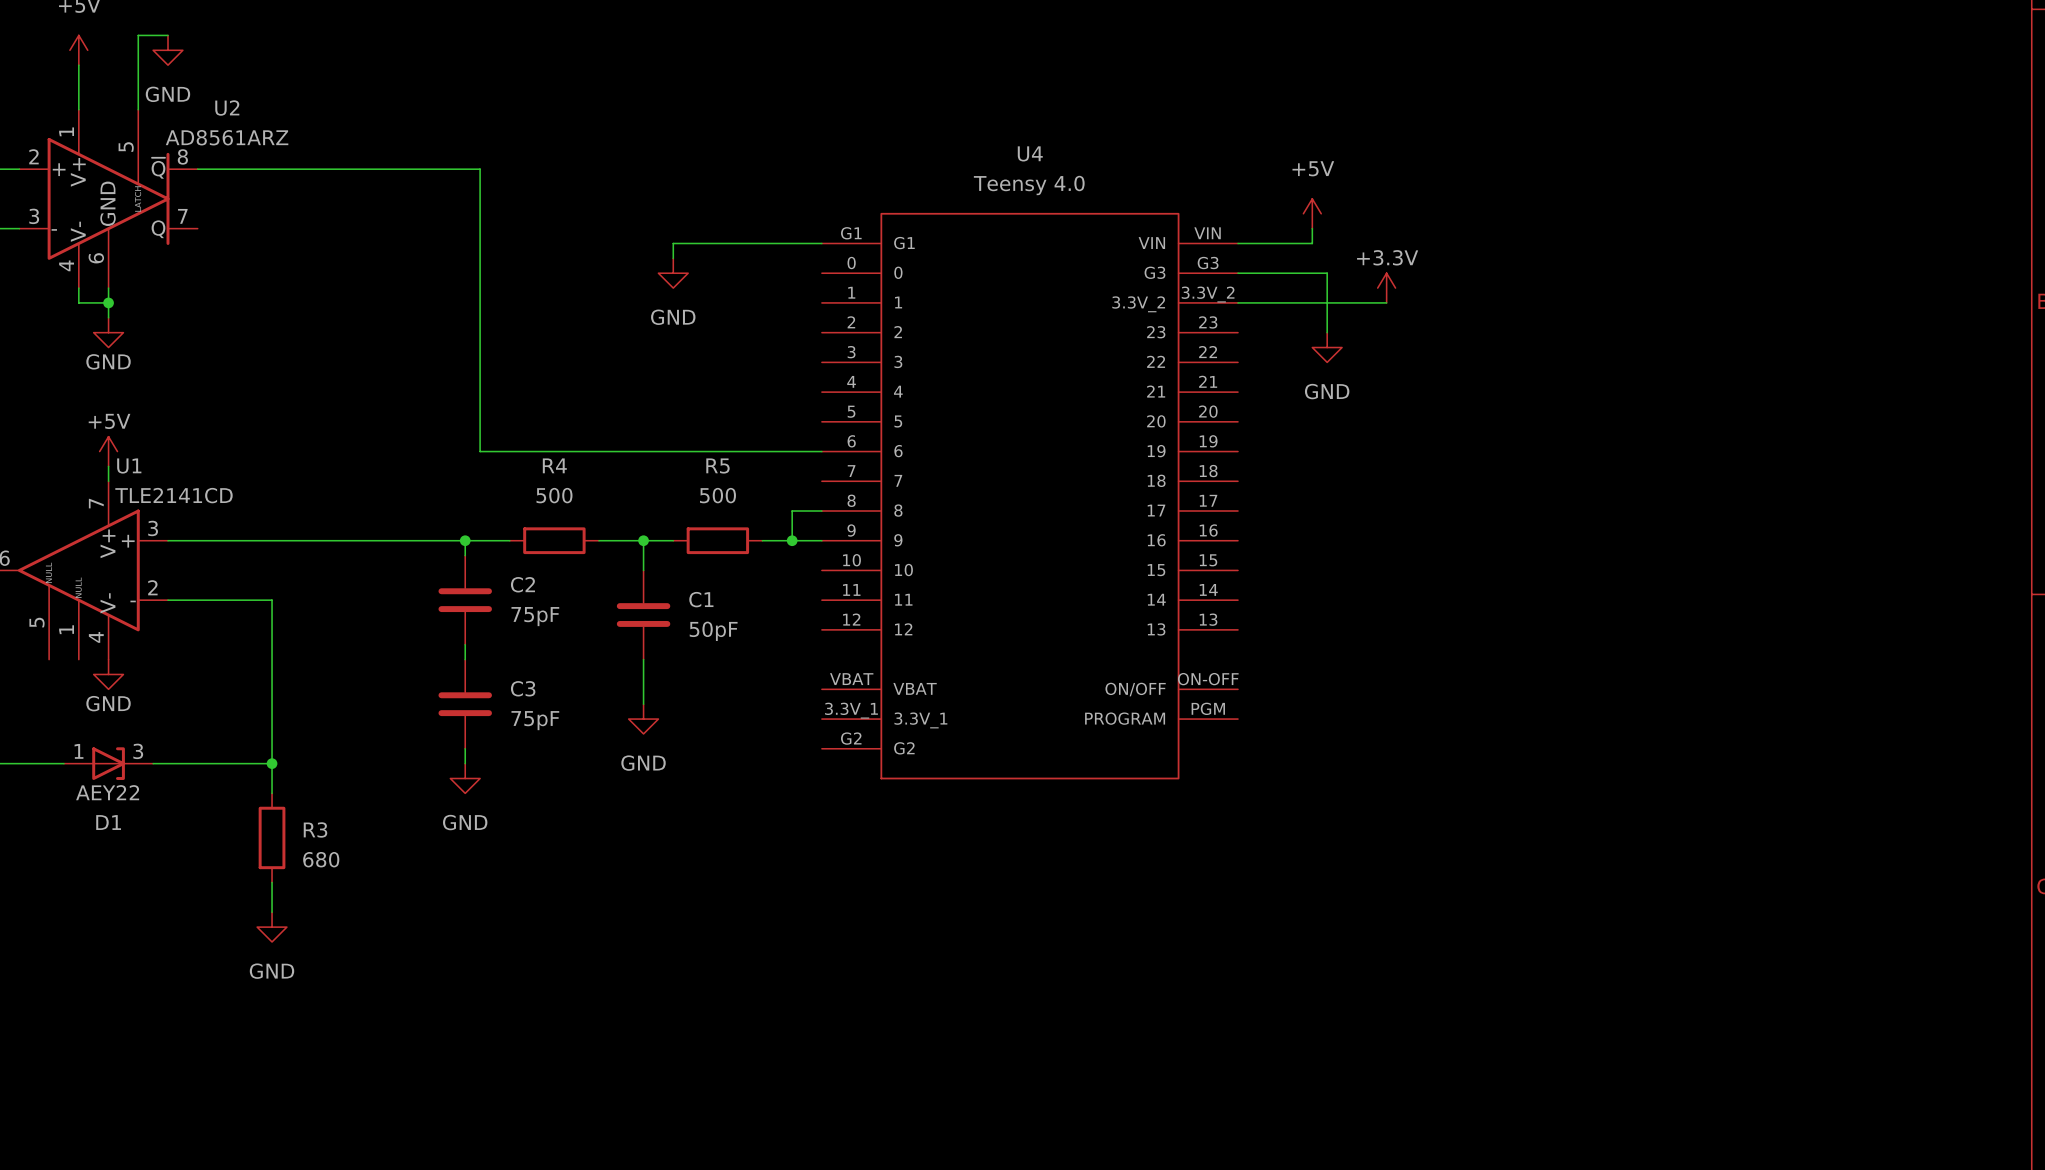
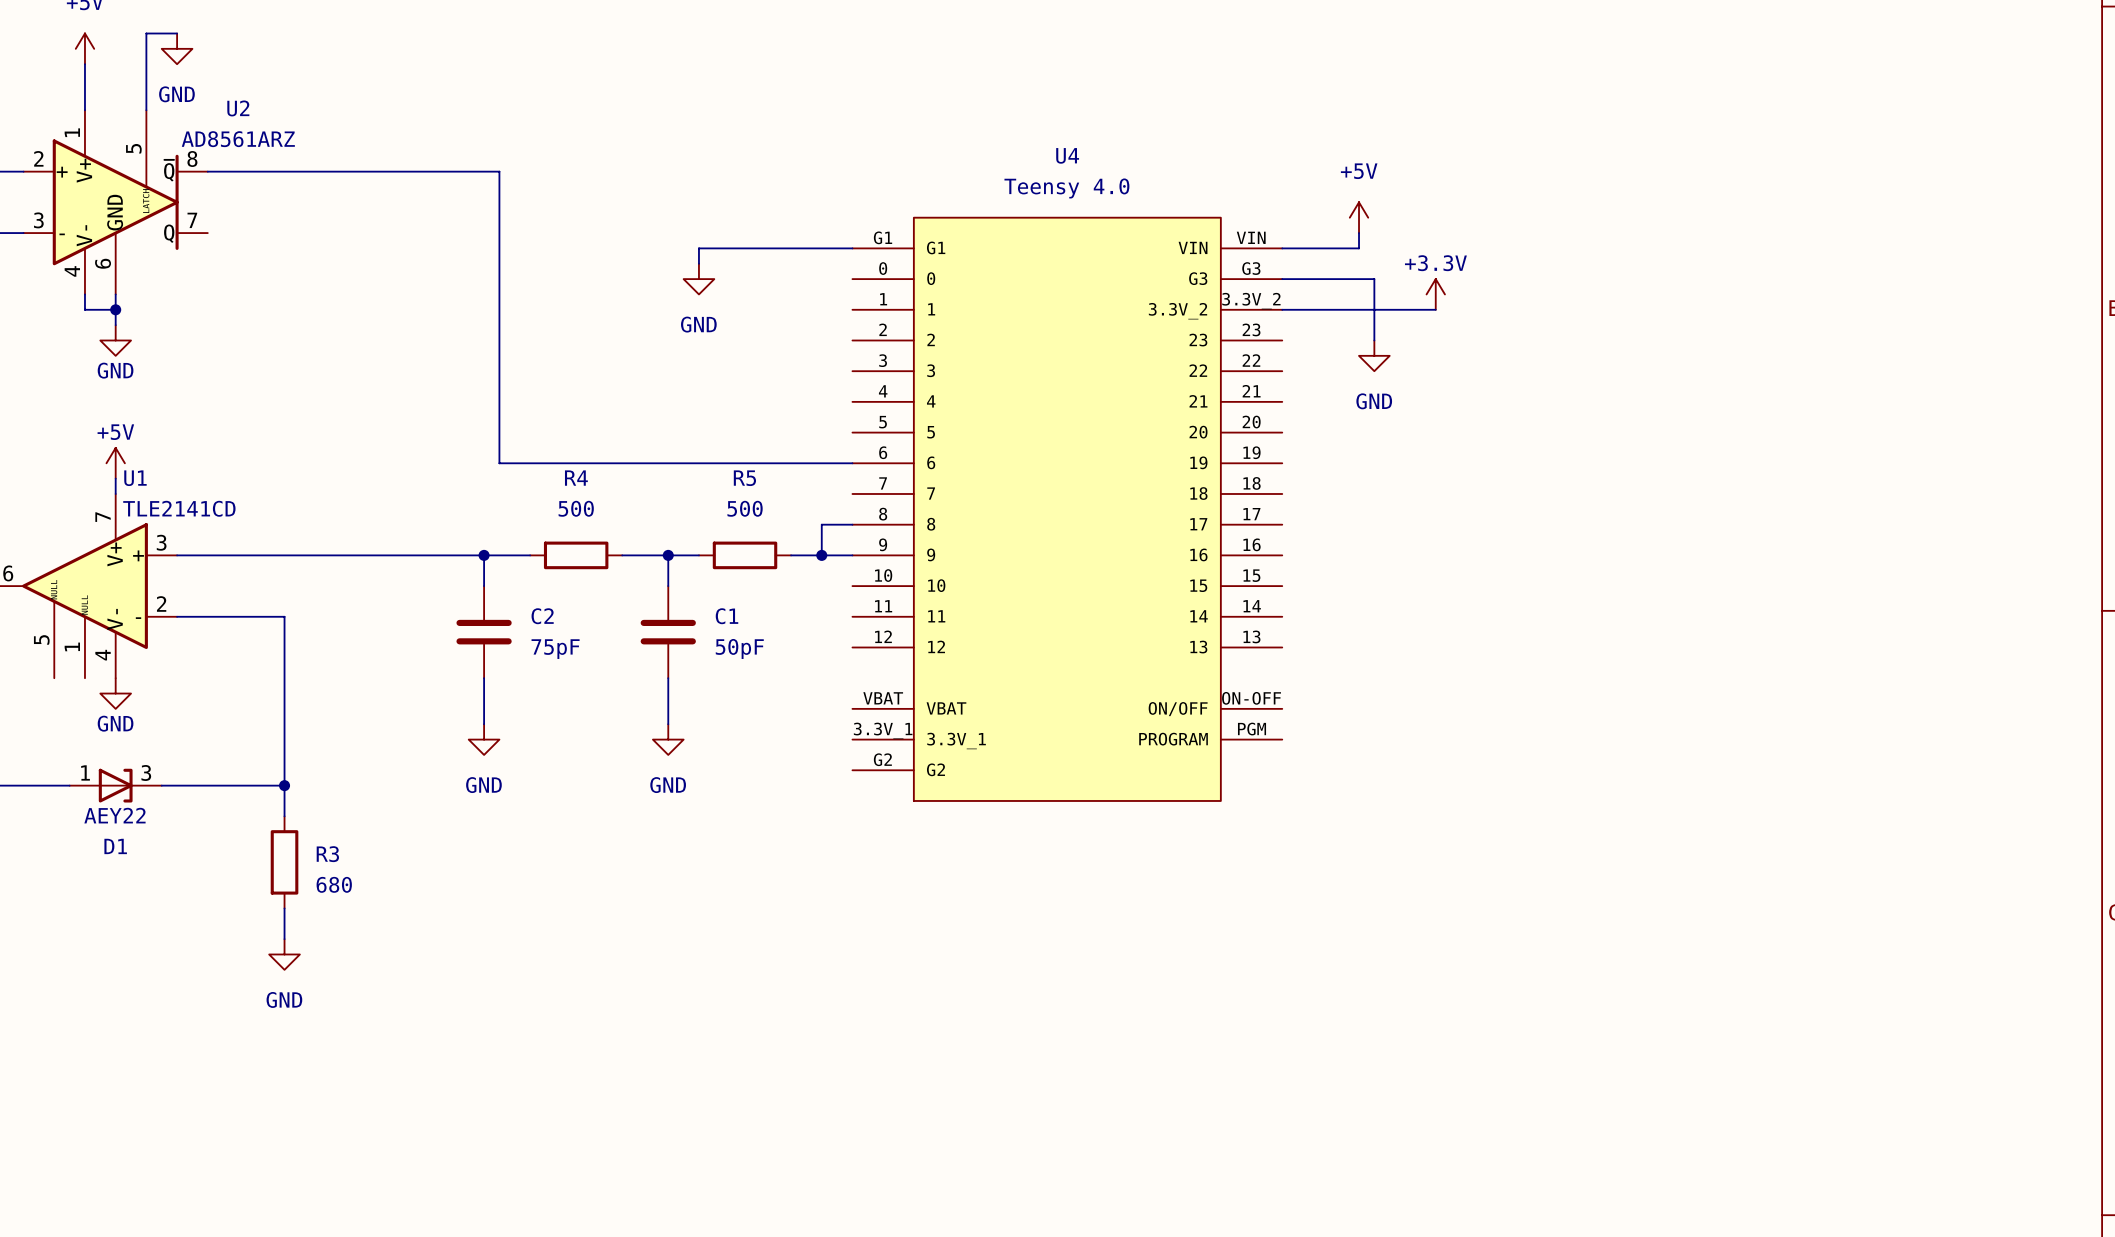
C2 position: (465, 600) -> (484, 632)
C3: 75pF (465, 704) -> none
power symbol position: GND (465, 778) -> GND (484, 739)

